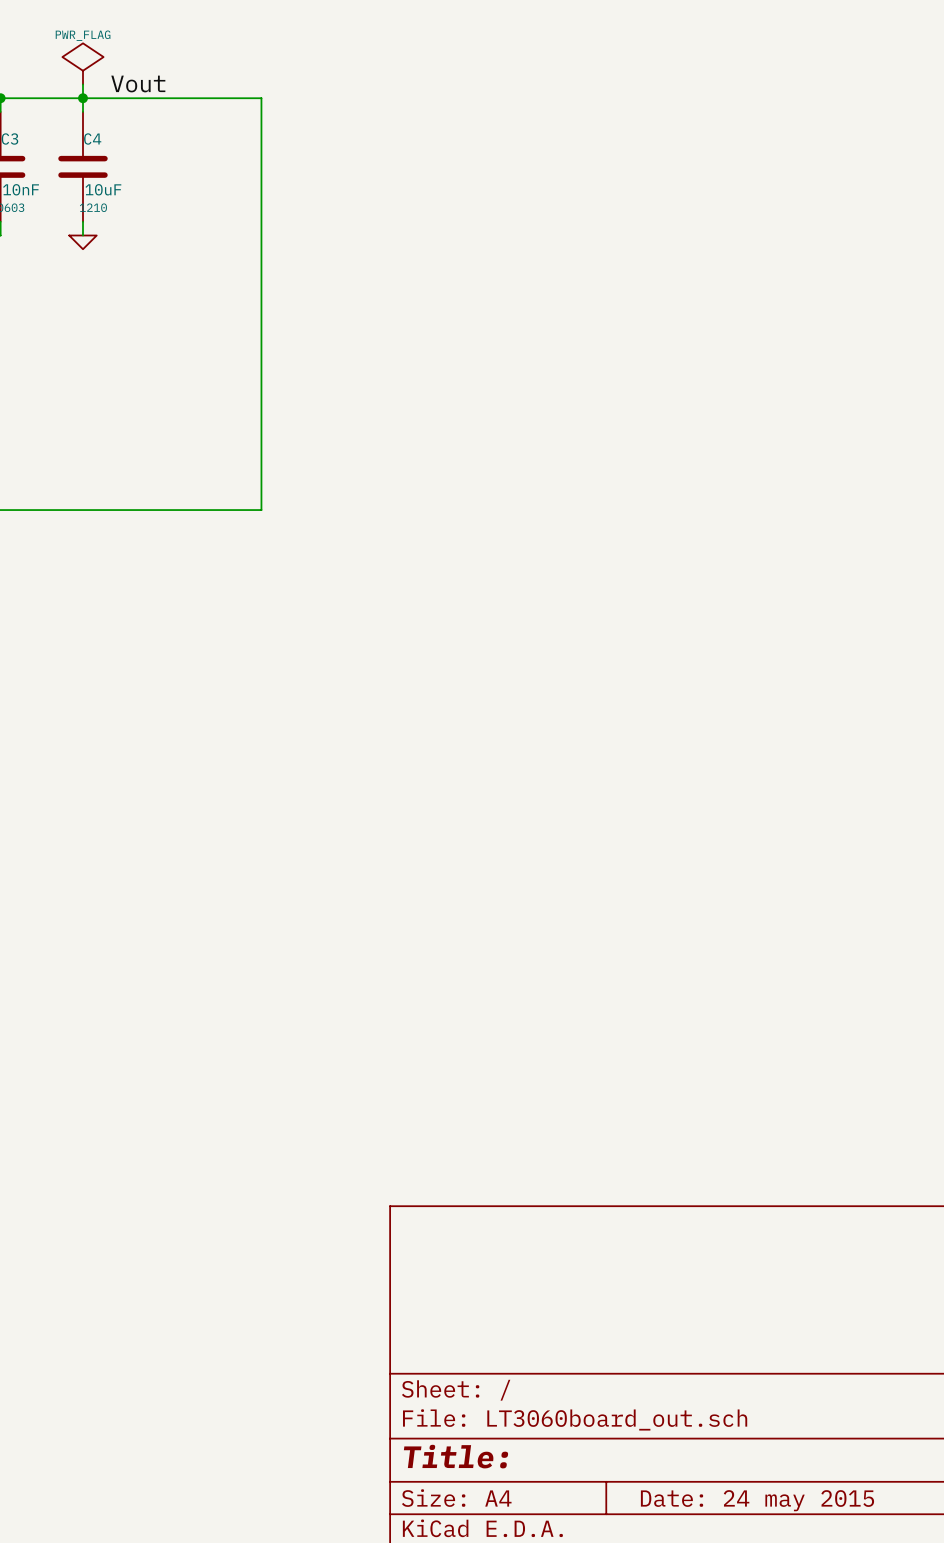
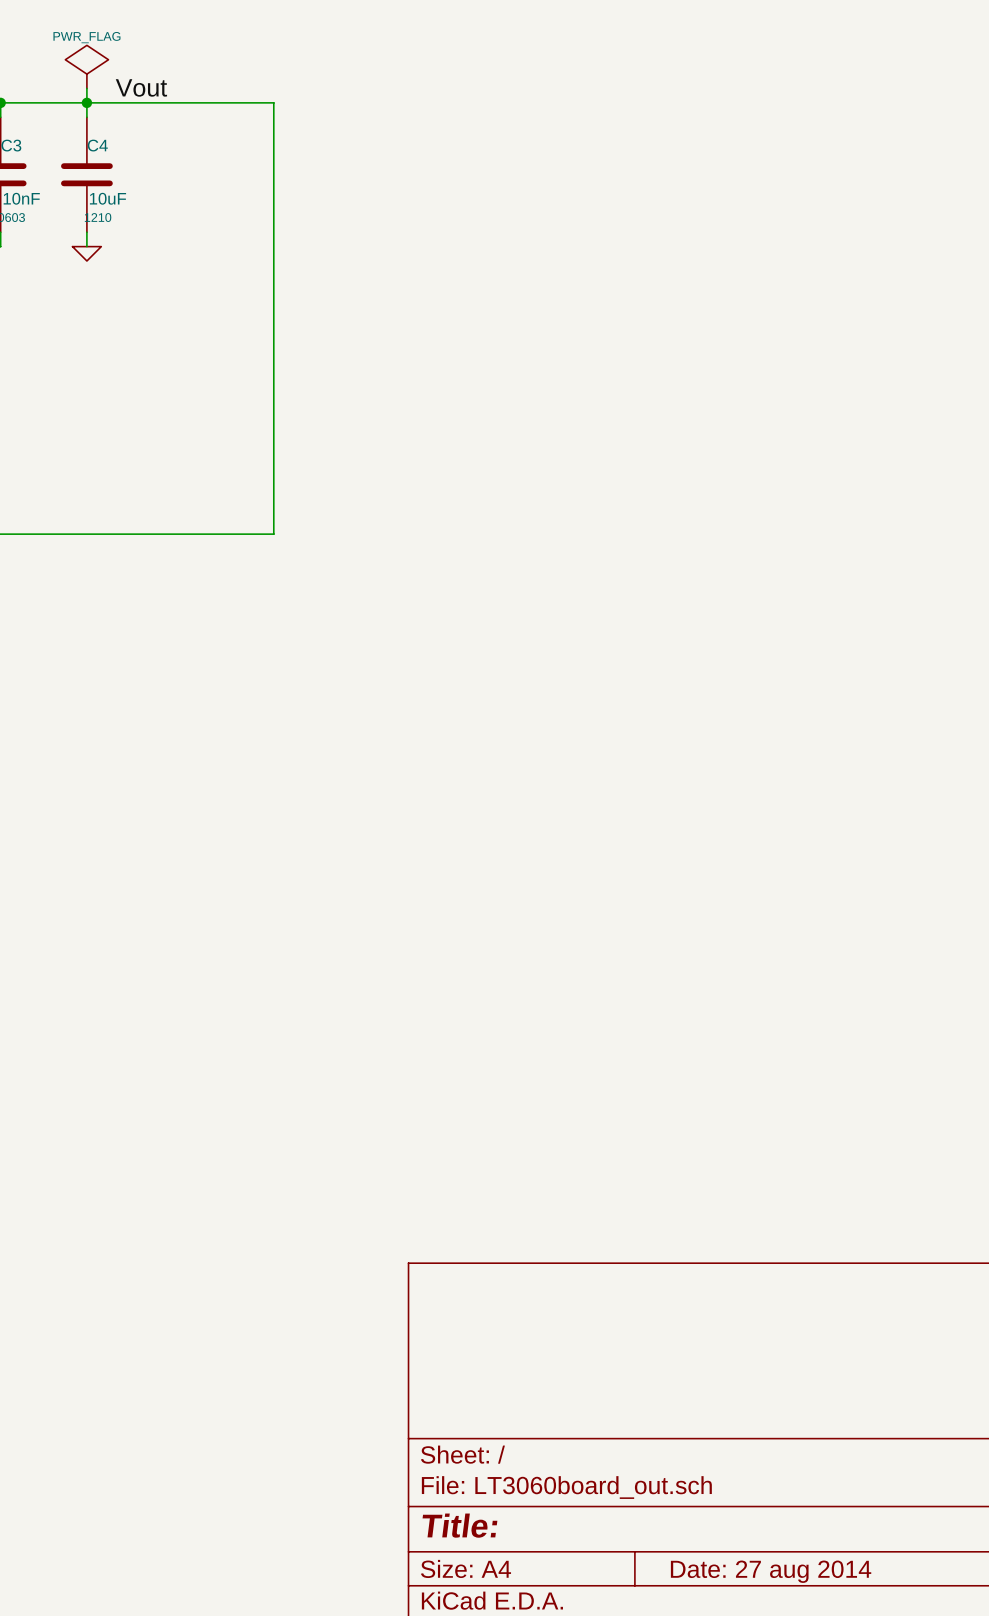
title block: Date: 24 may 2015 (757, 1500) -> Date: 27 aug 2014 (771, 1571)

